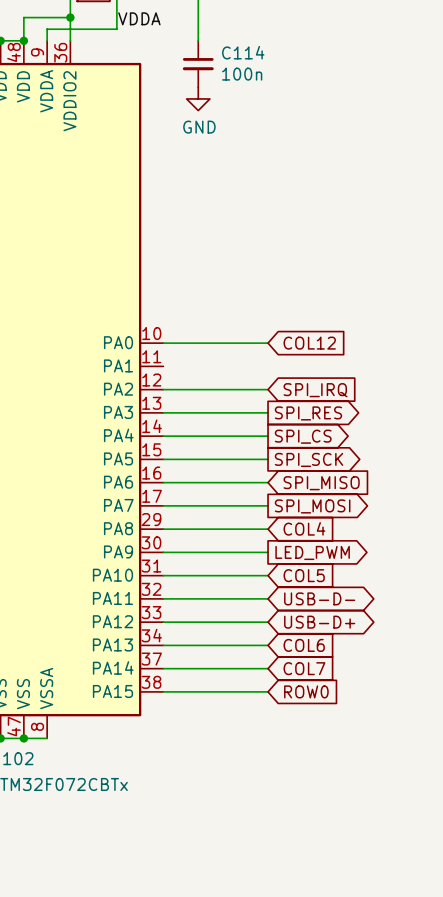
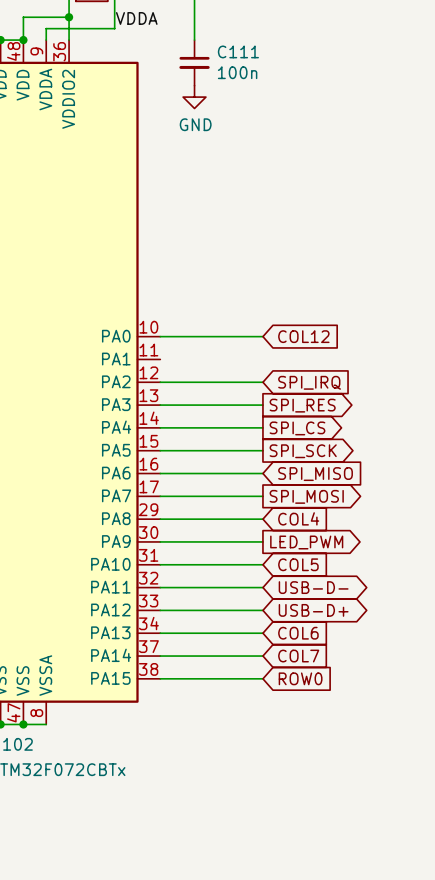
C114 name: C114 (243, 52) -> C111 (238, 51)

